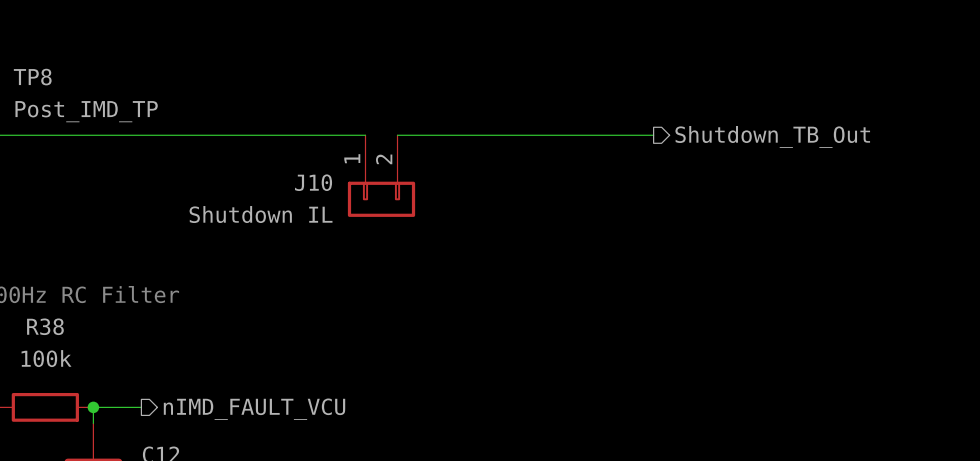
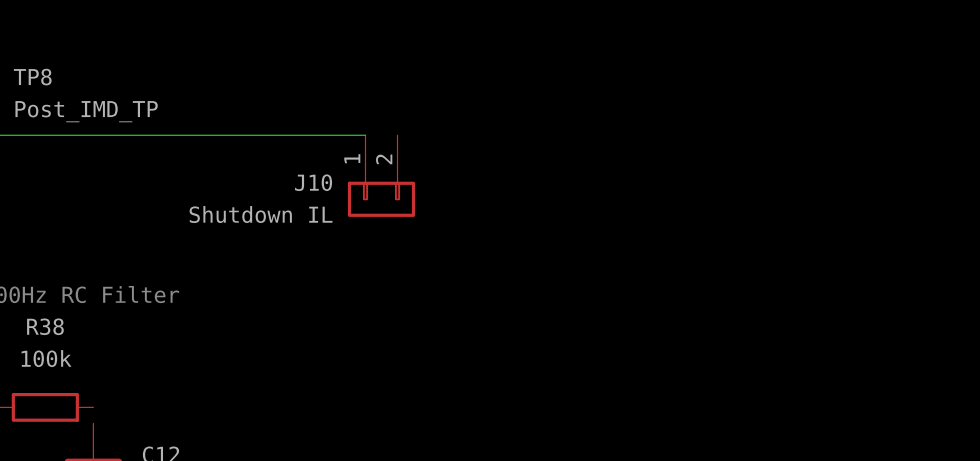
wire: (397, 135) (653, 135) -> none
hierarchical label: Shutdown_TB_Out (772, 136) -> none
junction: (93, 407) -> none
wire: (141, 407) (93, 407) (93, 423) -> none
hierarchical label: nIMD_FAULT_VCU (254, 409) -> none

